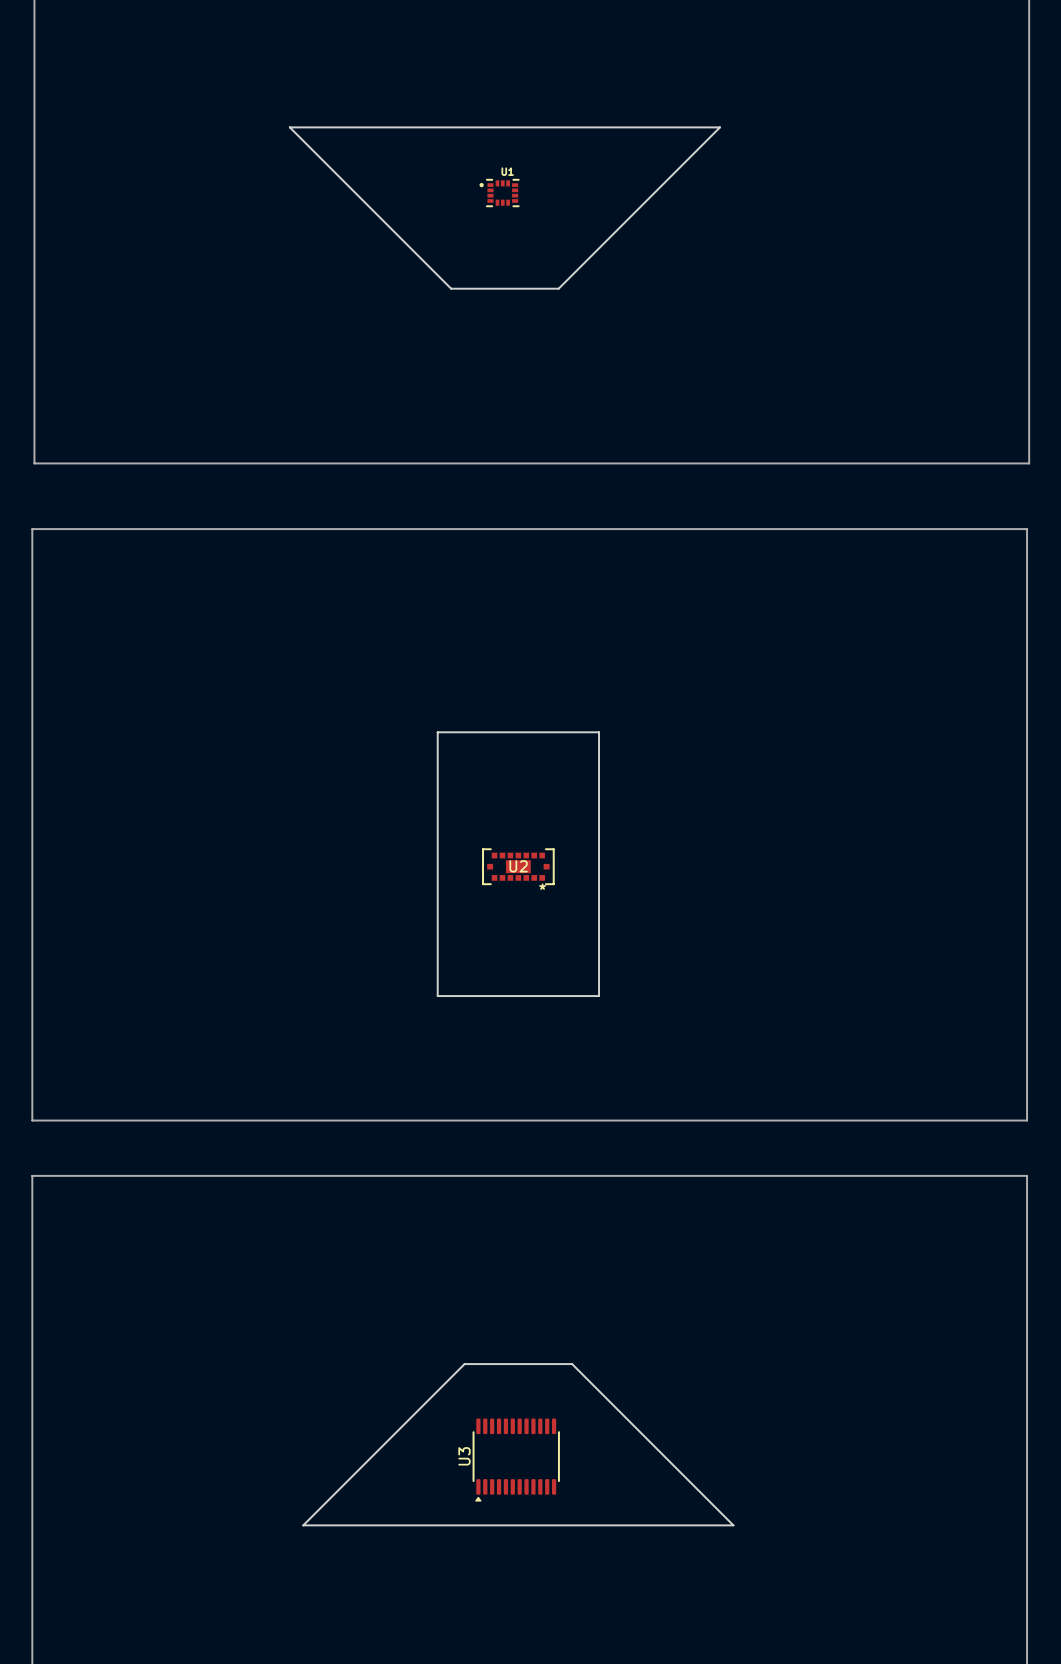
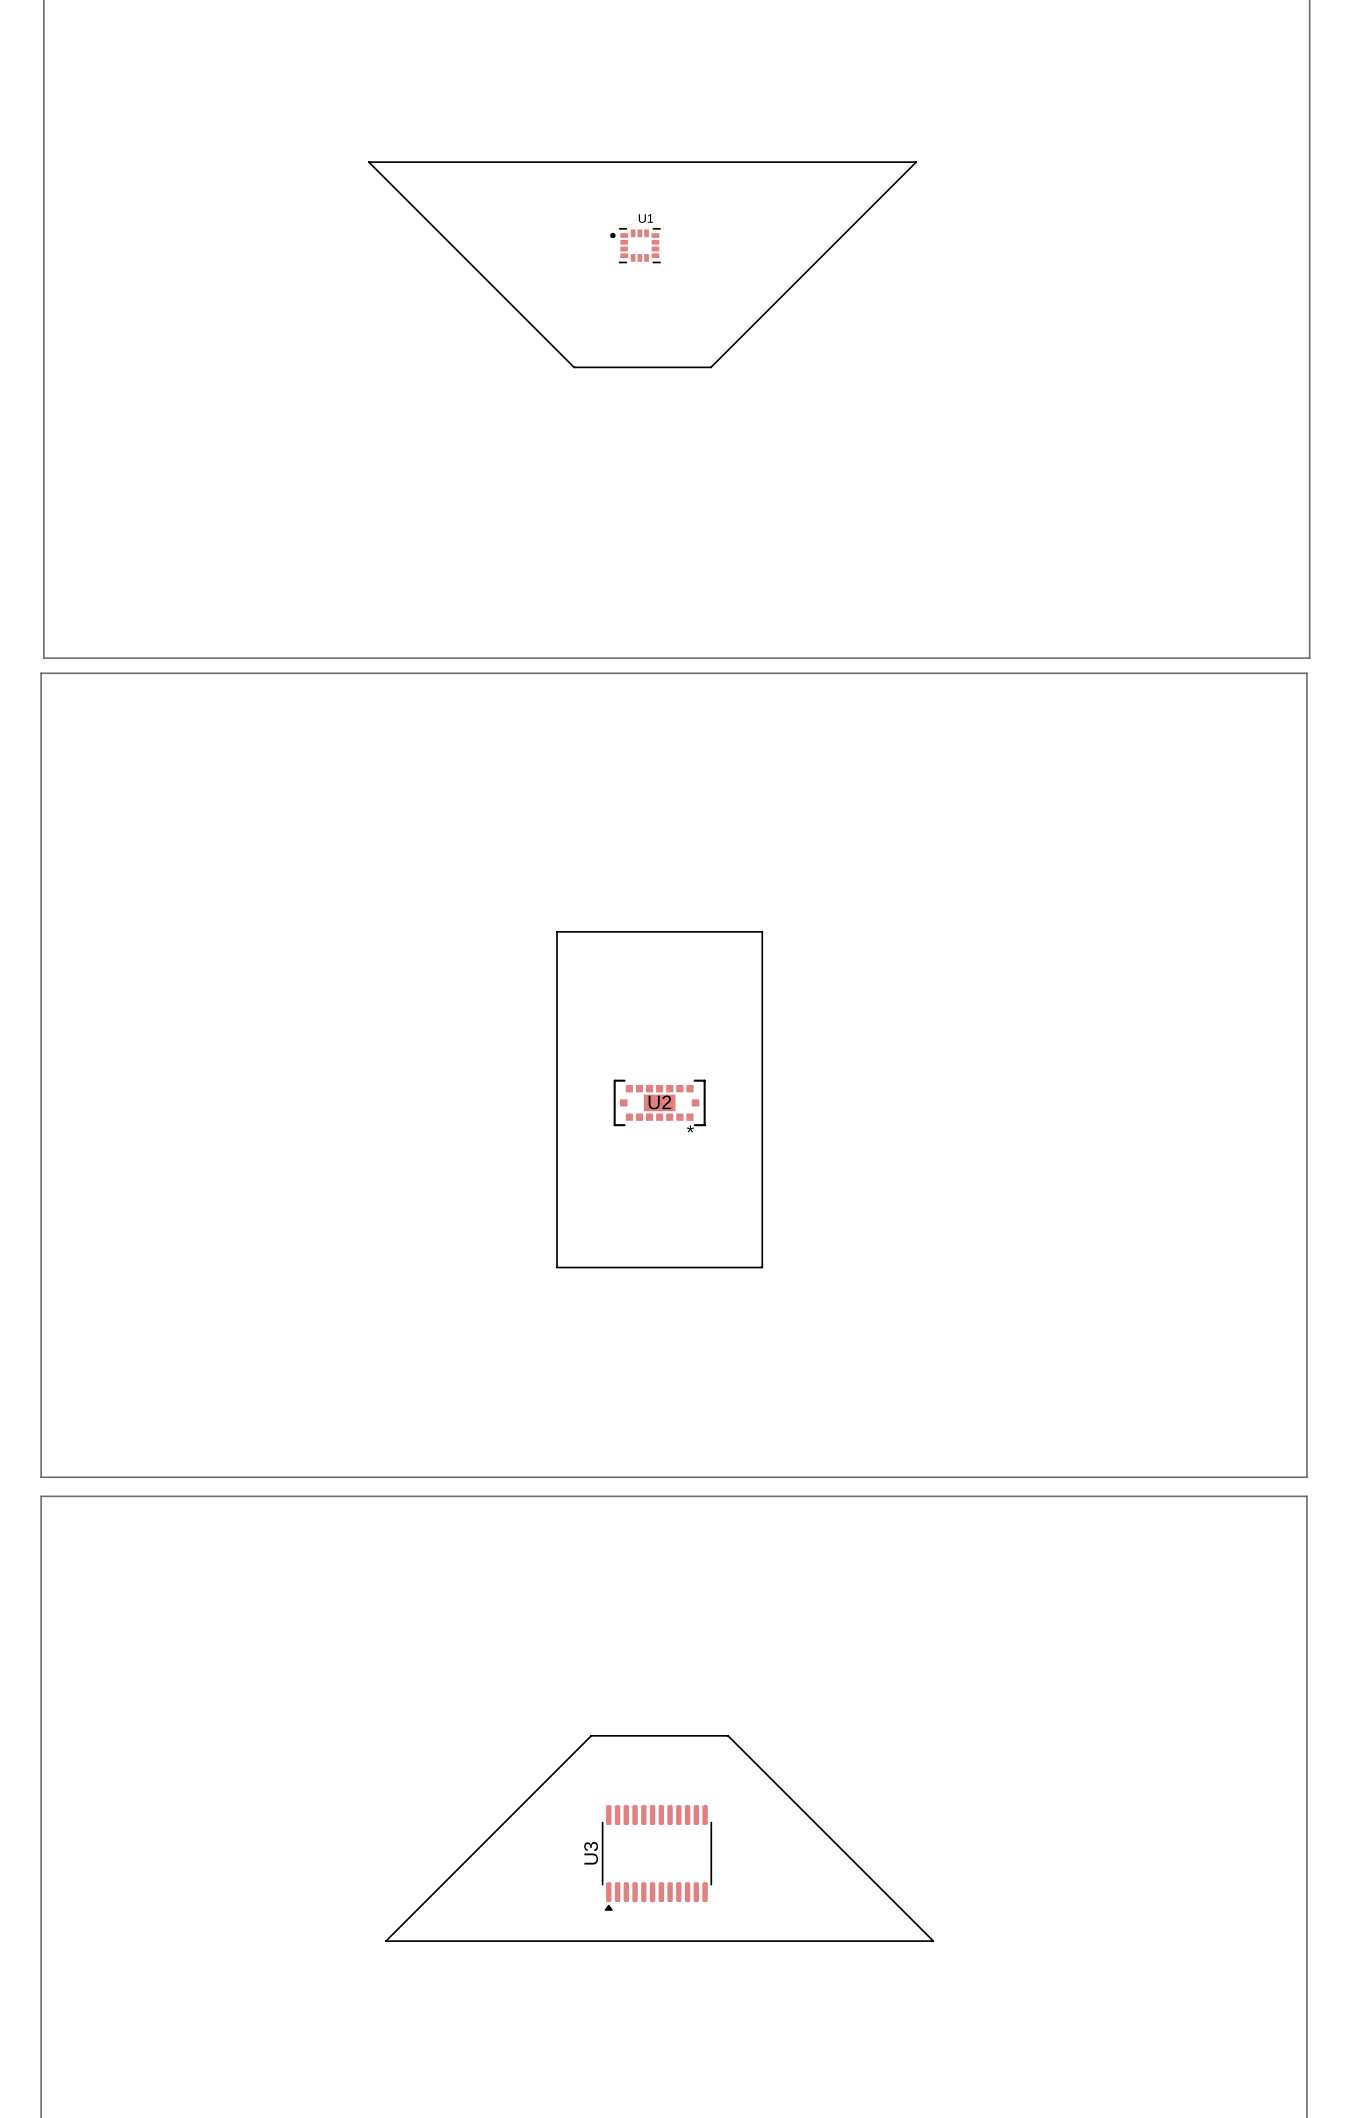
line: (34, 463) (1029, 463) -> (43, 589) (43, 658) (1309, 658) (1309, 589)
line: (32, 1120) (1027, 1120) -> (41, 1425) (41, 1477) (1306, 1477) (1306, 1425)

